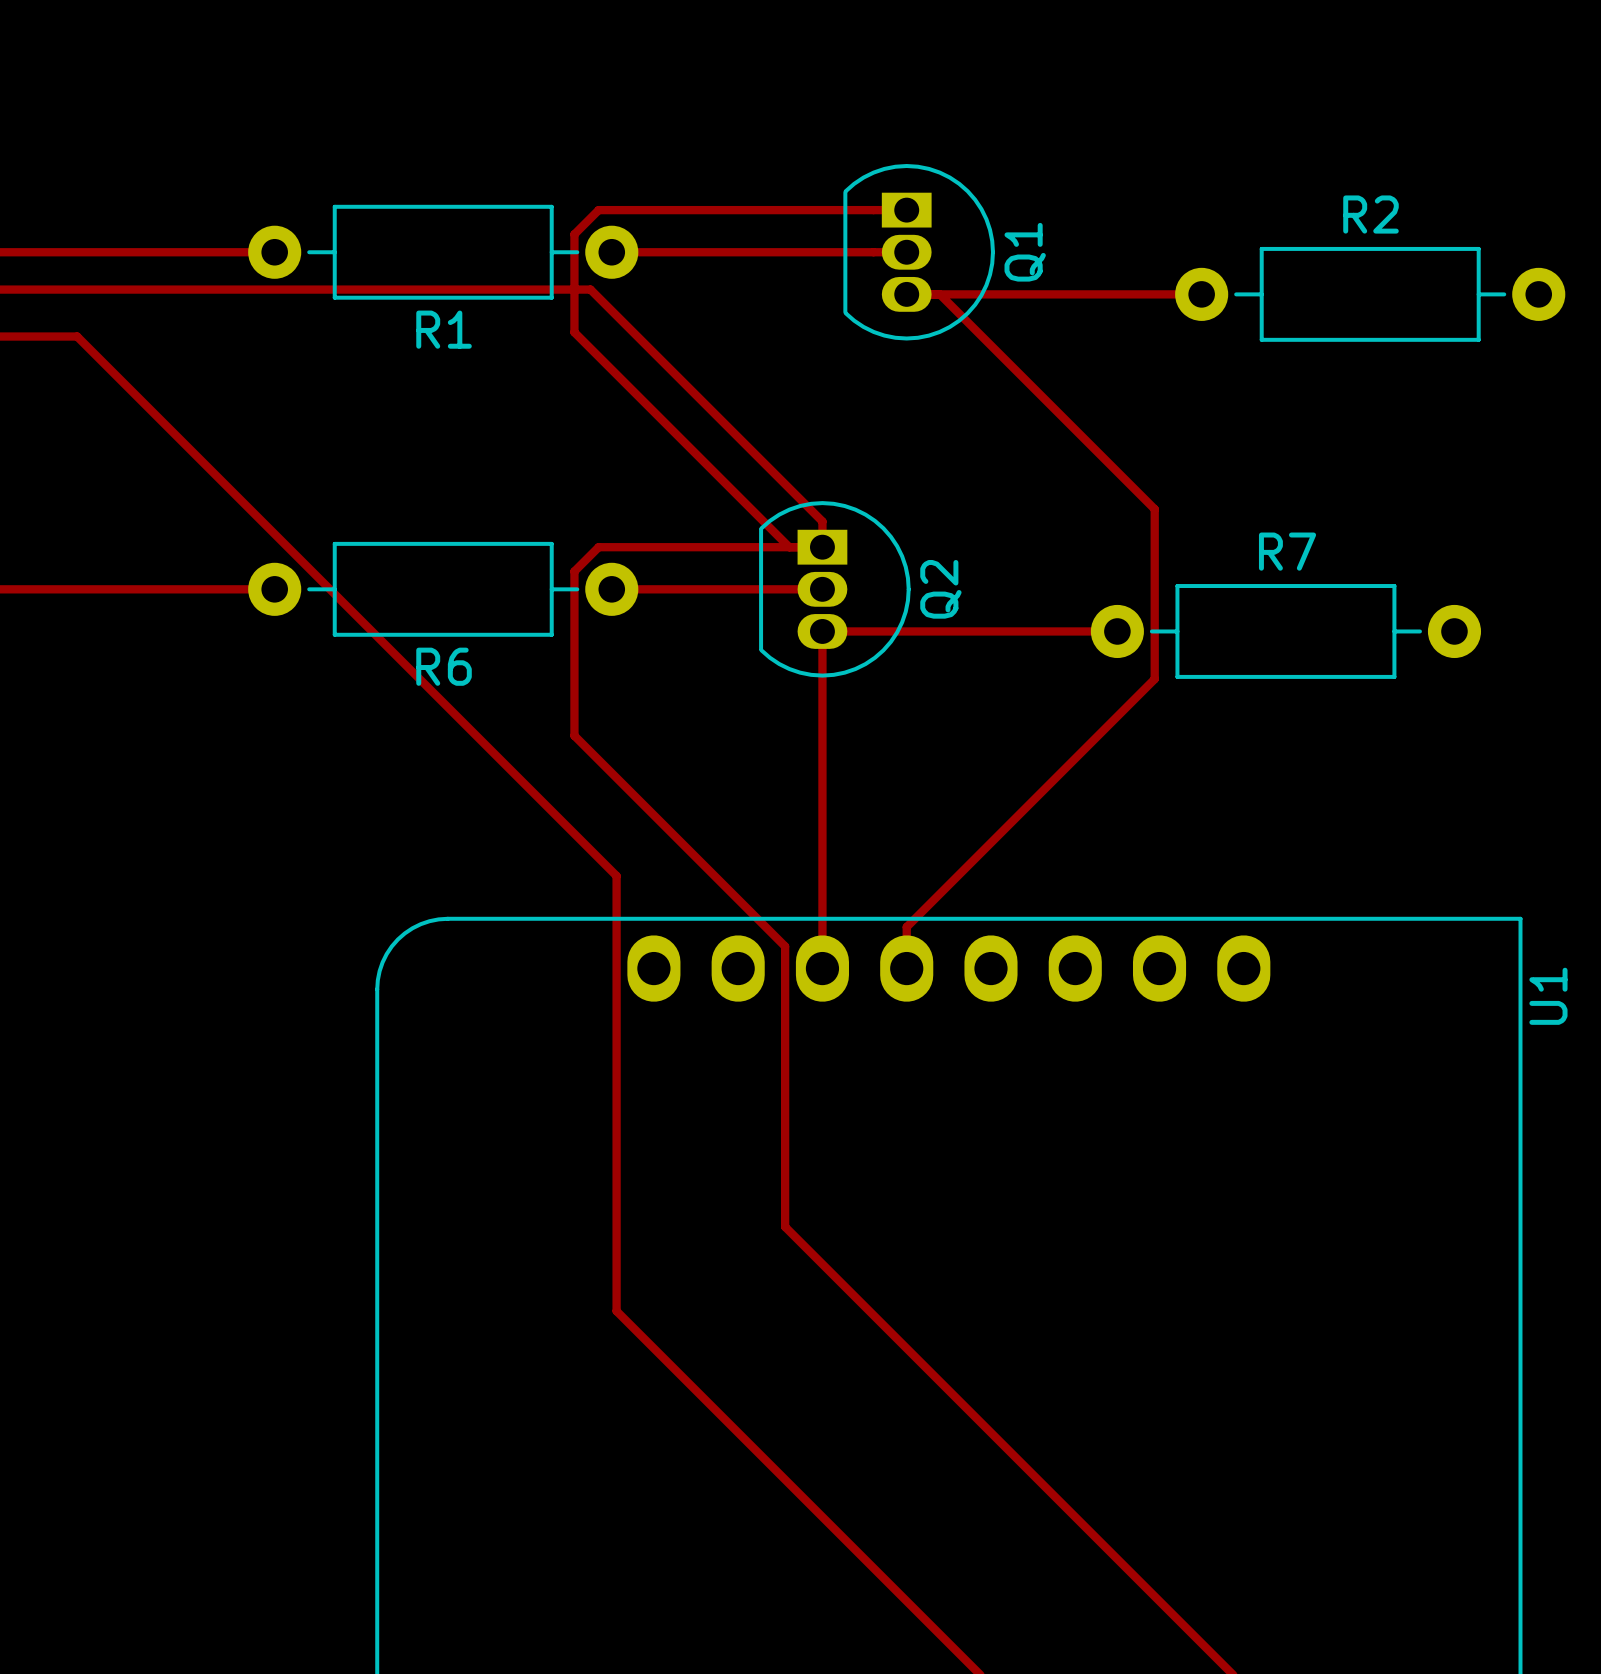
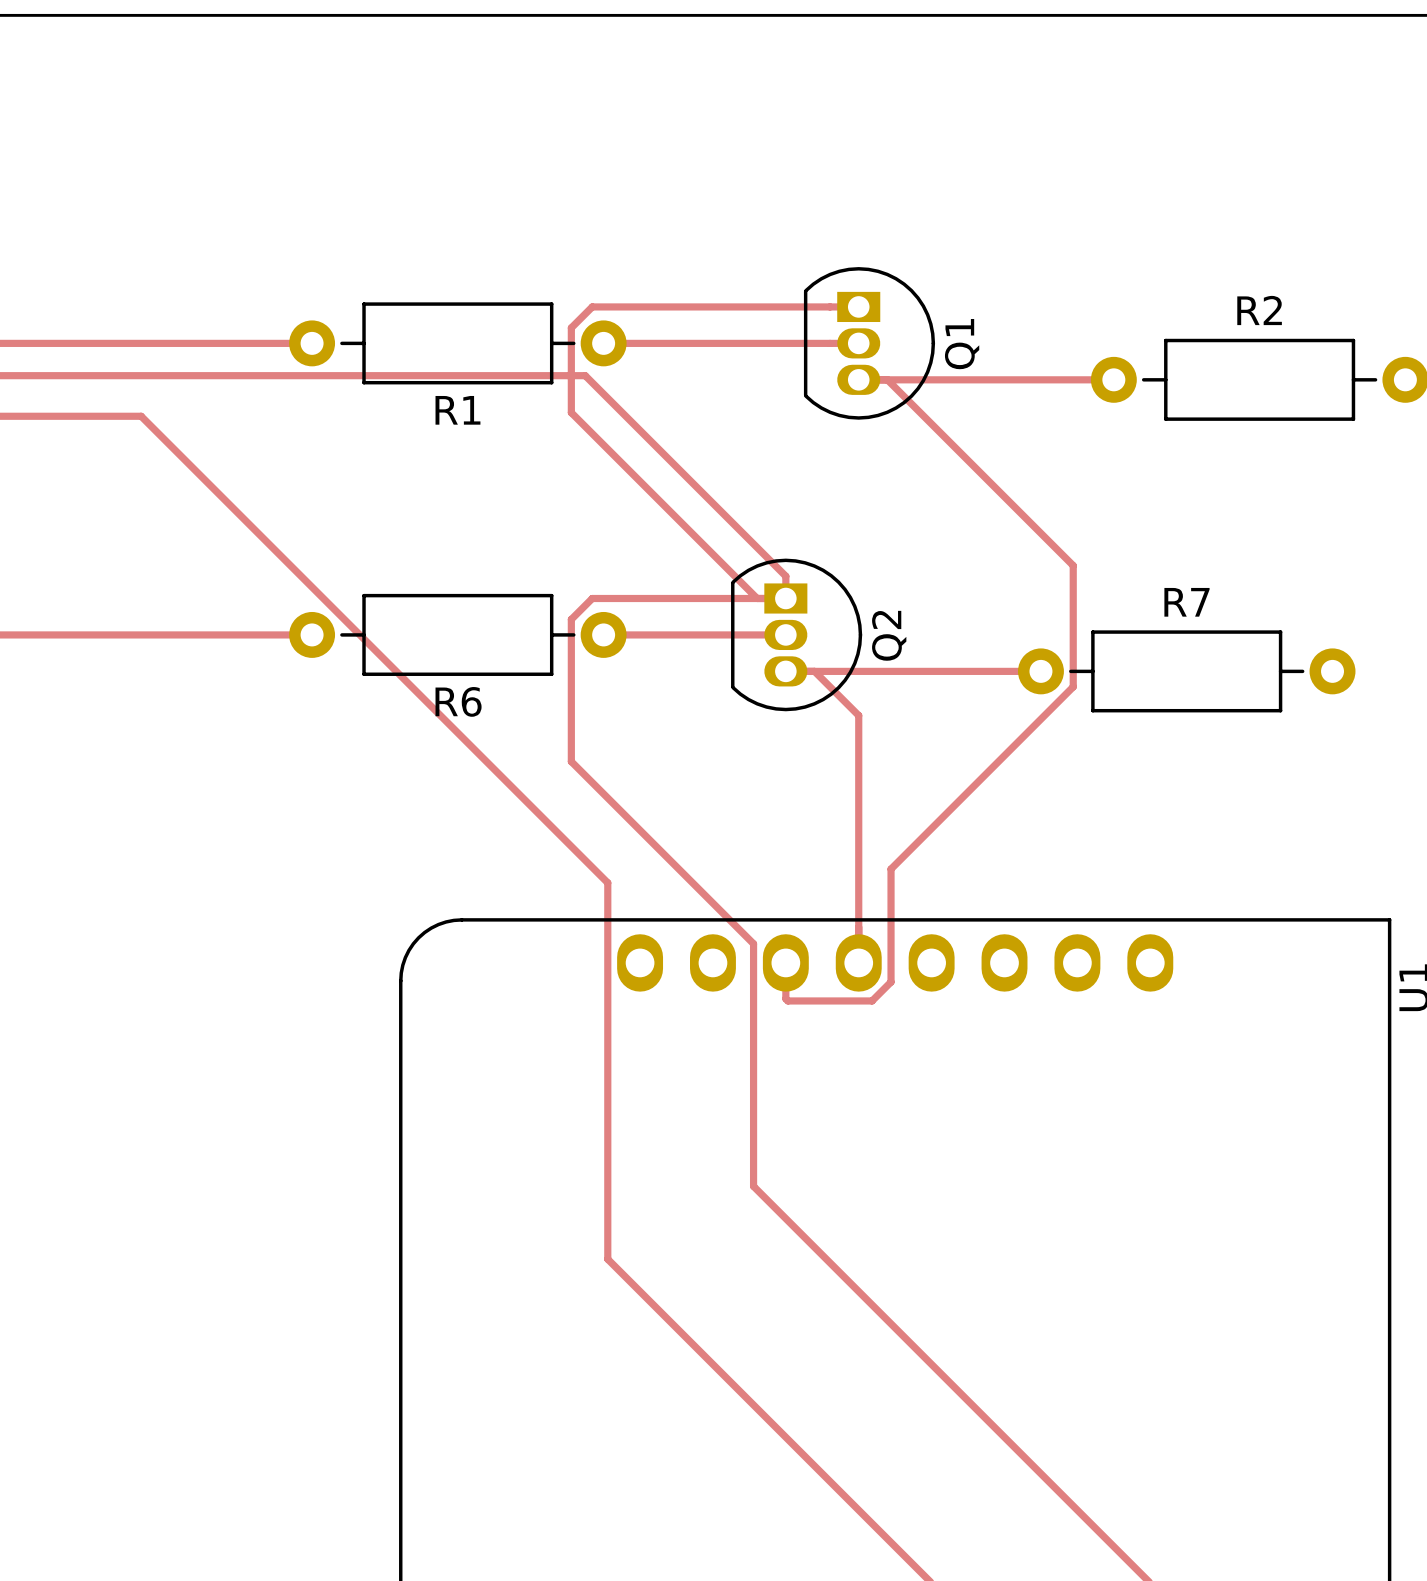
track: (822, 631) (822, 968) -> none
track: none -> (814, 671) (858, 715) (858, 927)
track: (1154, 649) (1154, 679) (906, 927) -> (1073, 686) (891, 869) (891, 982) (872, 1000) (788, 1000) (785, 998) (785, 962)

